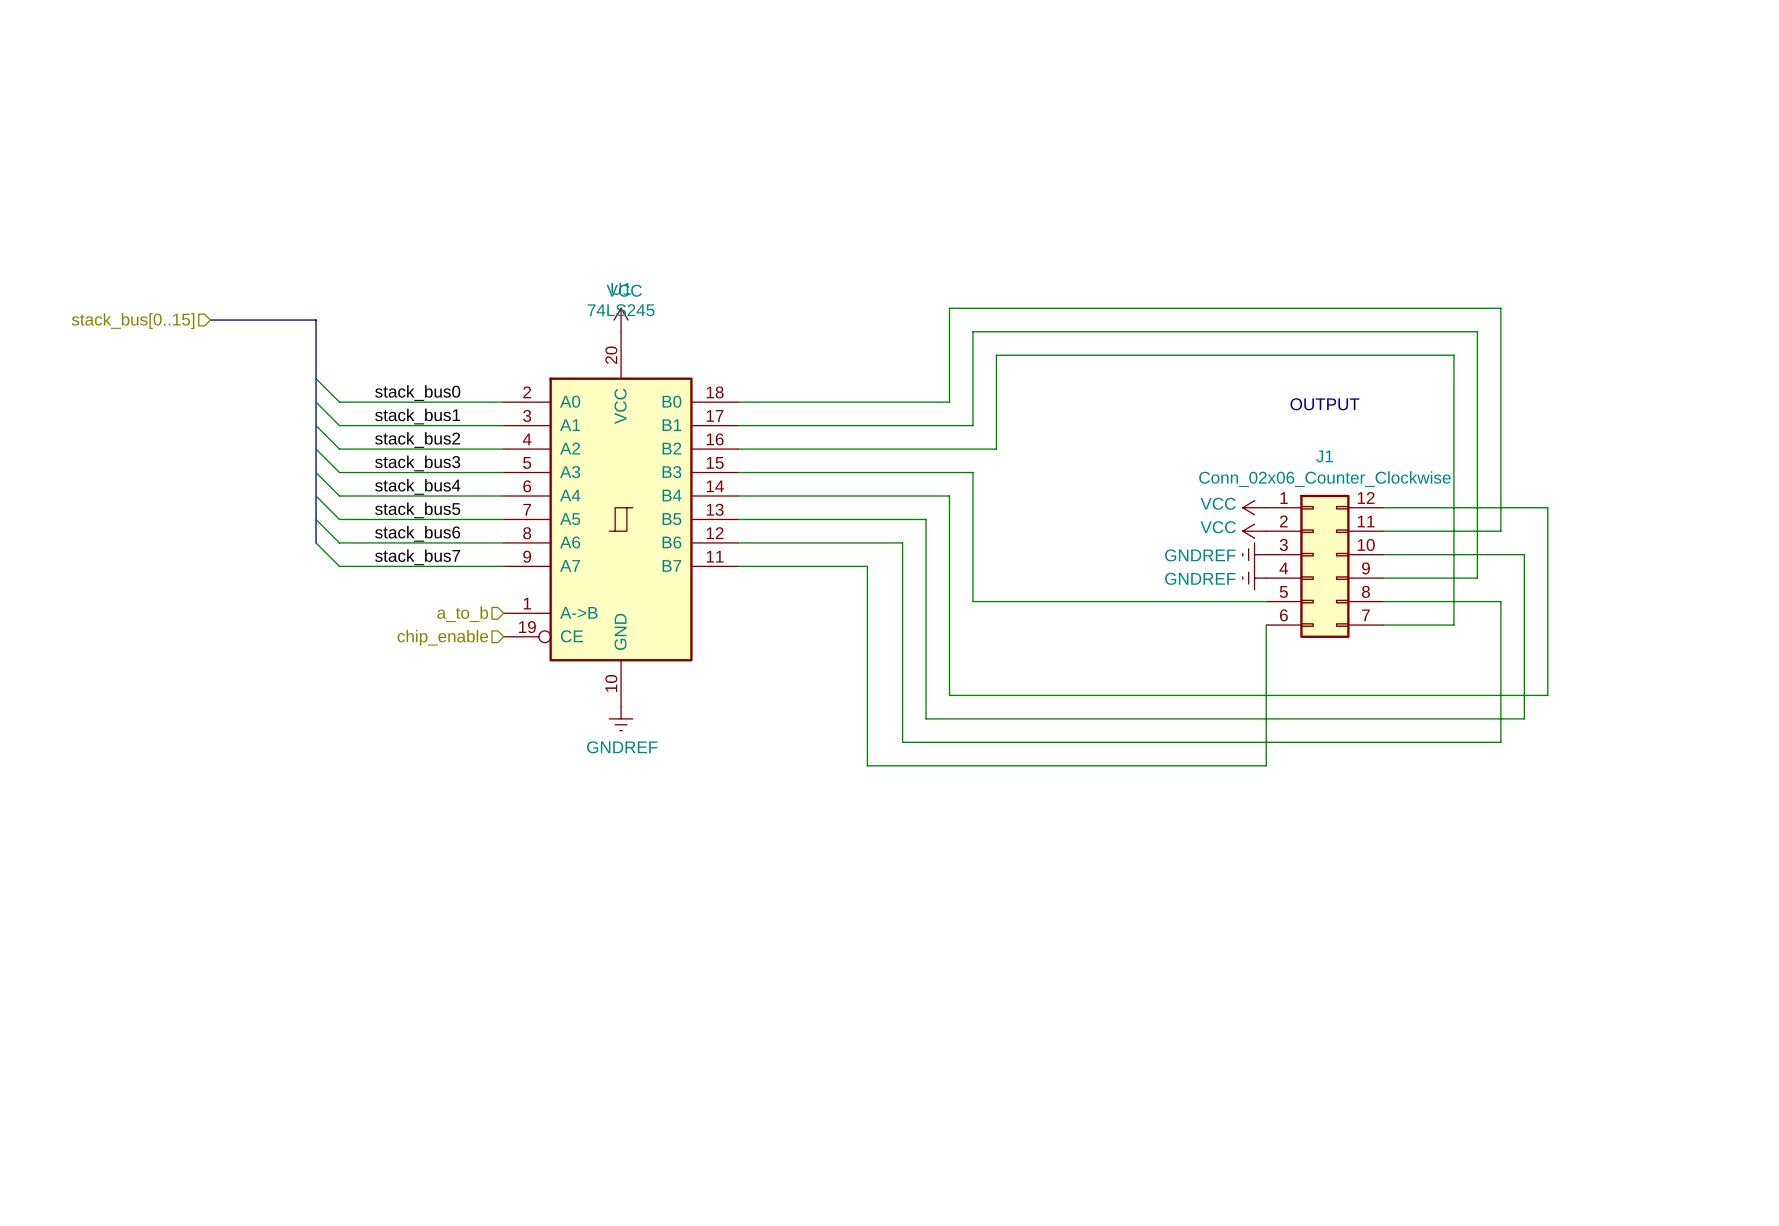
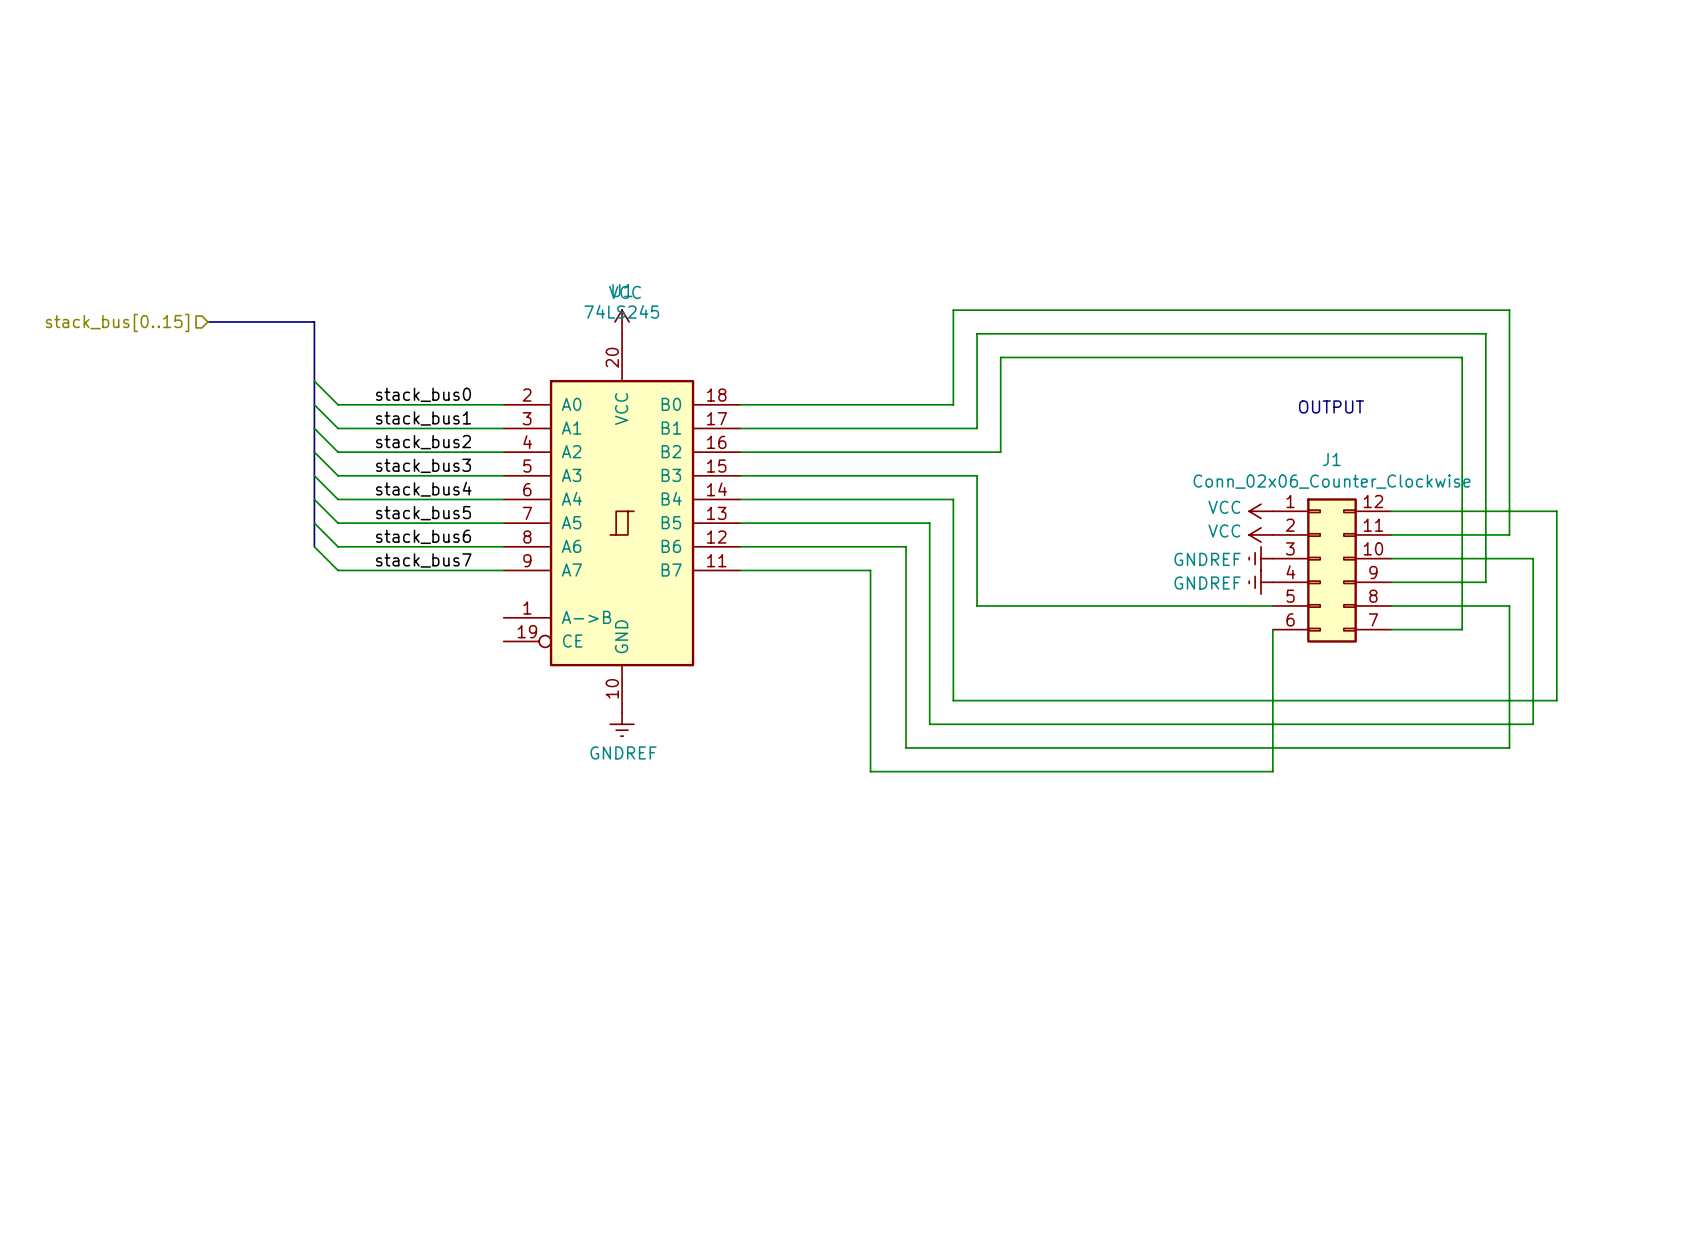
hierarchical label: a_to_b (462, 614) -> none
hierarchical label: chip_enable (442, 637) -> none

